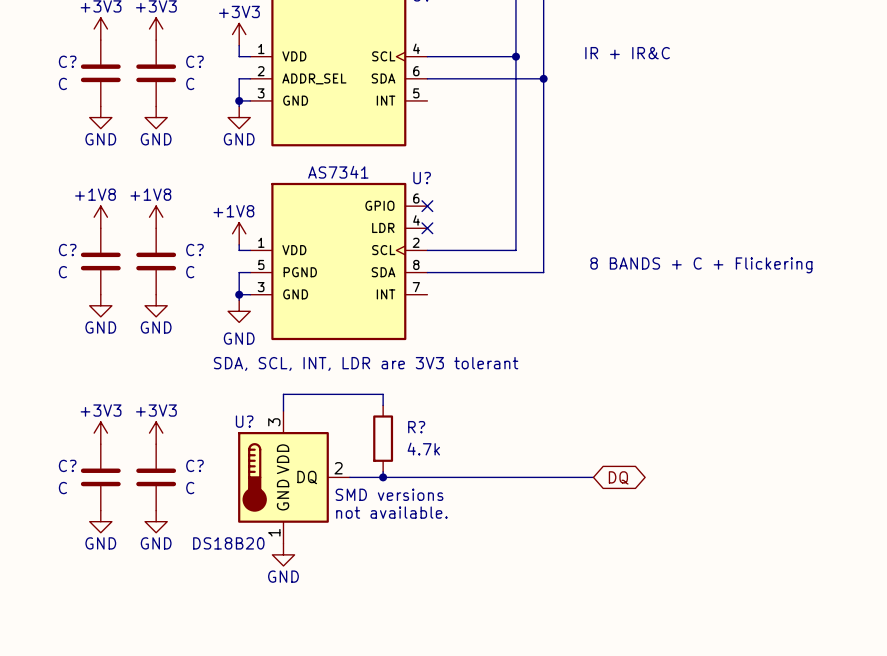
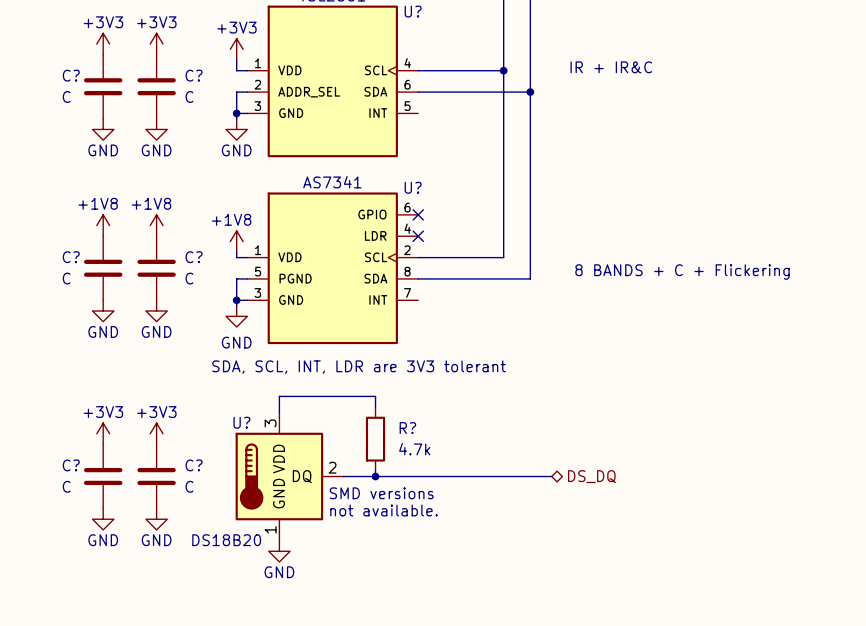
wire: (565, 477) (593, 477) -> none
hierarchical label: none -> DS_DQ (592, 476)
global label: DQ (618, 477) -> none

